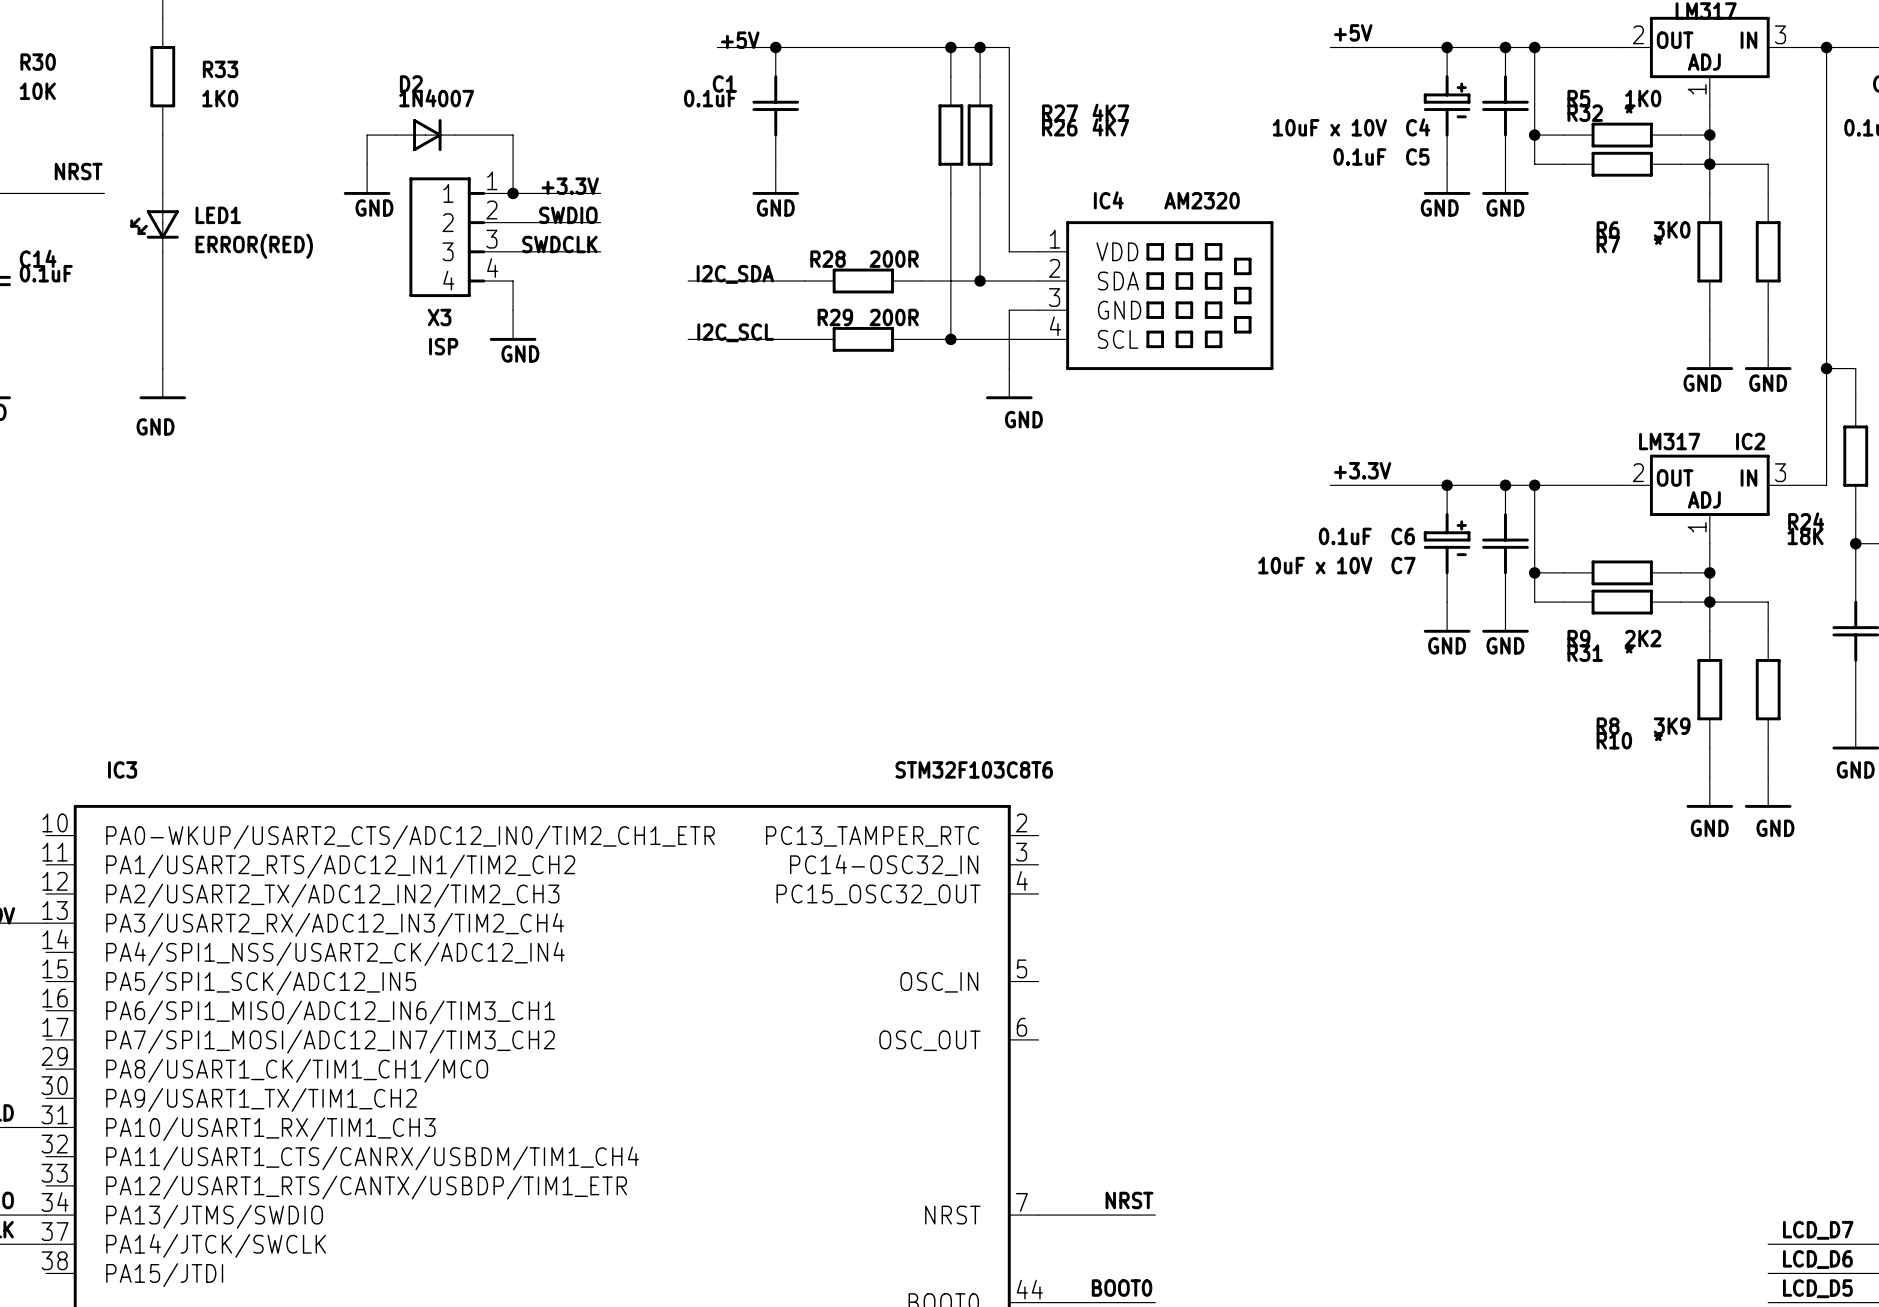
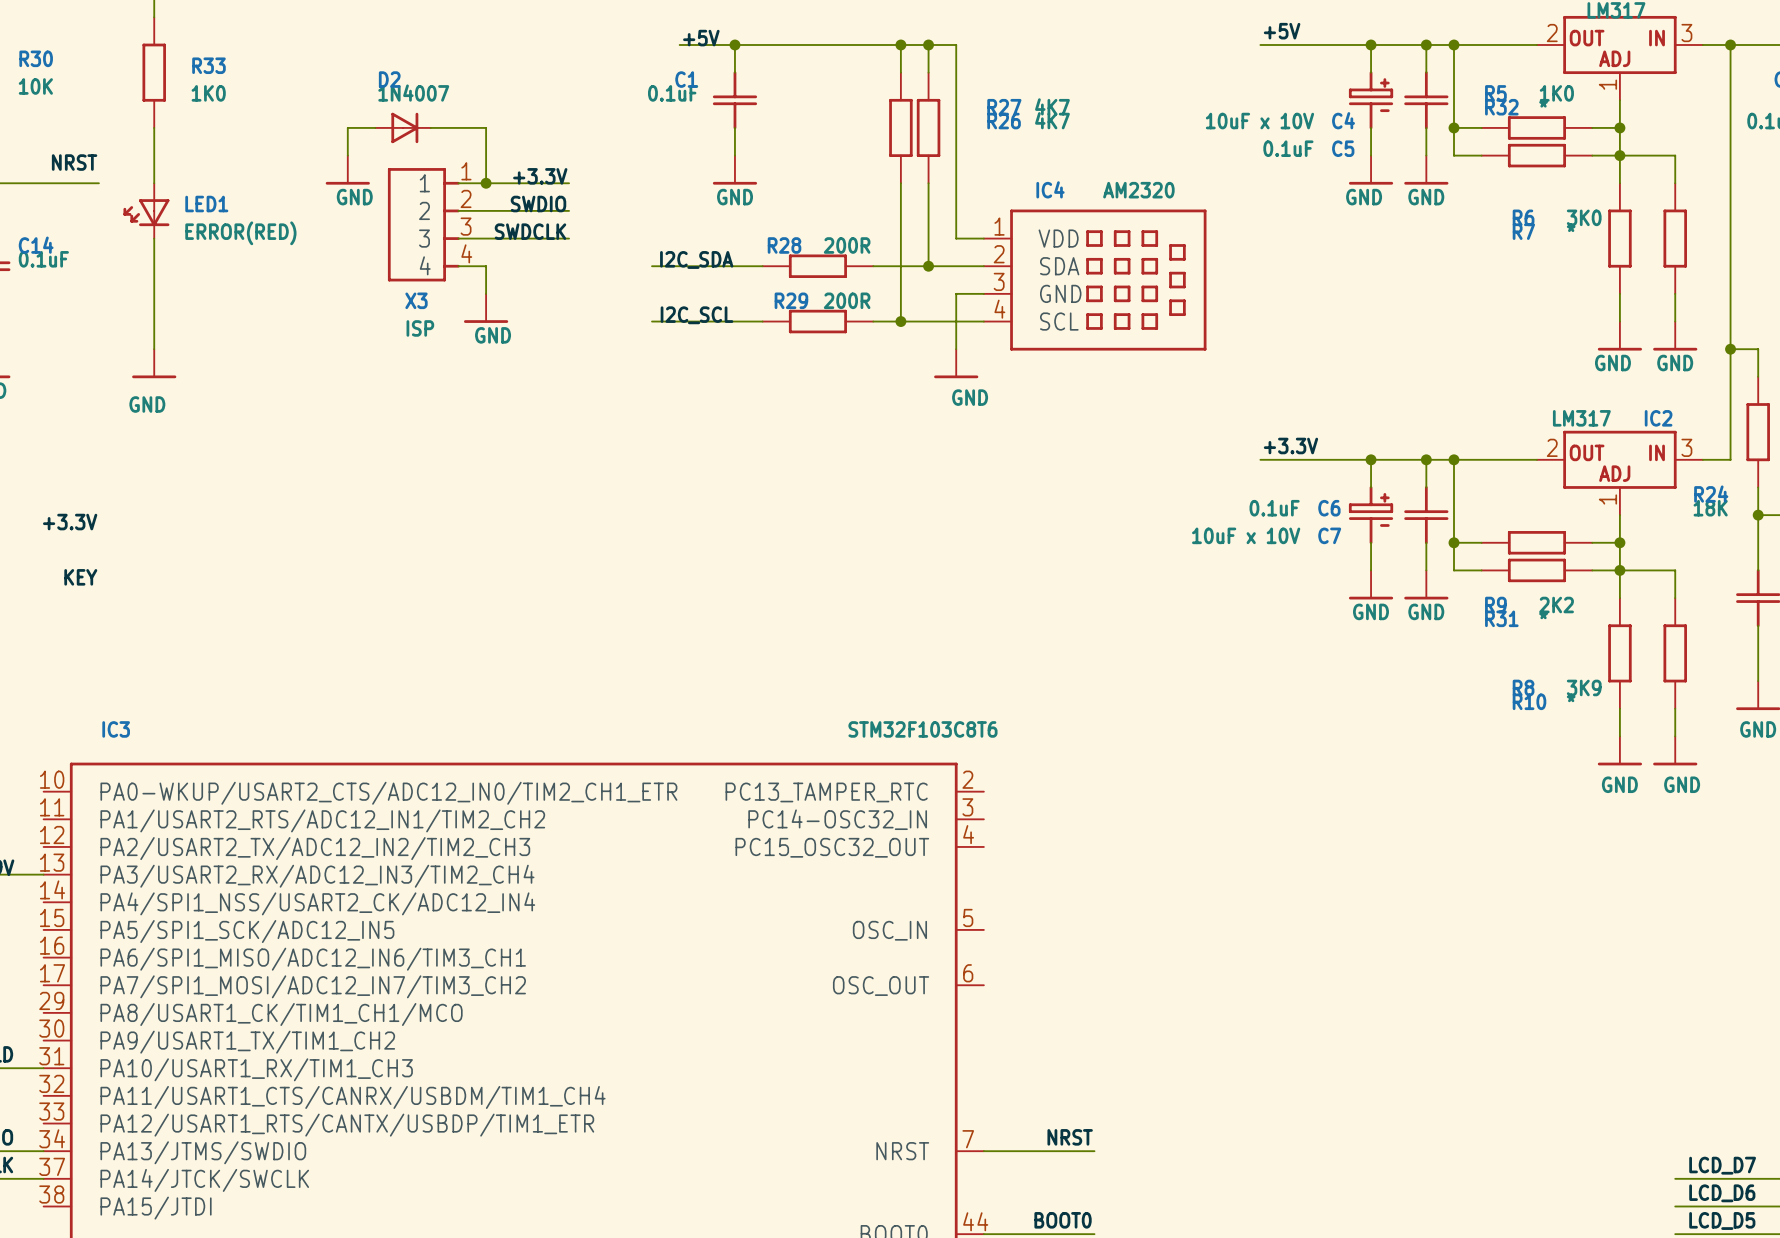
label: none -> +3.3V (70, 522)
label: none -> KEY (80, 577)

